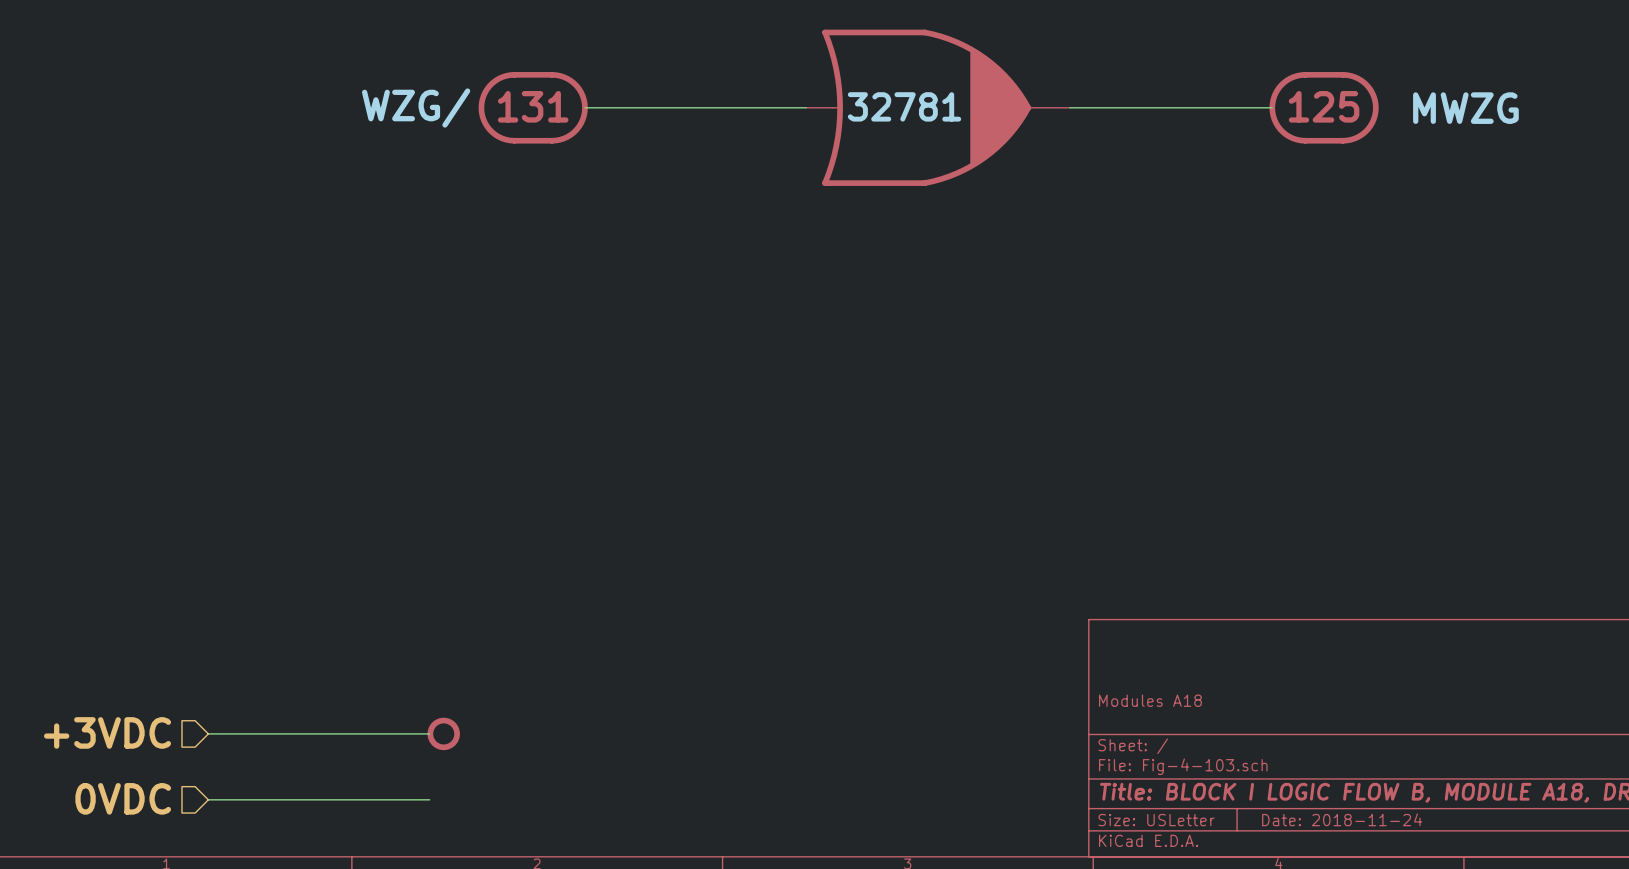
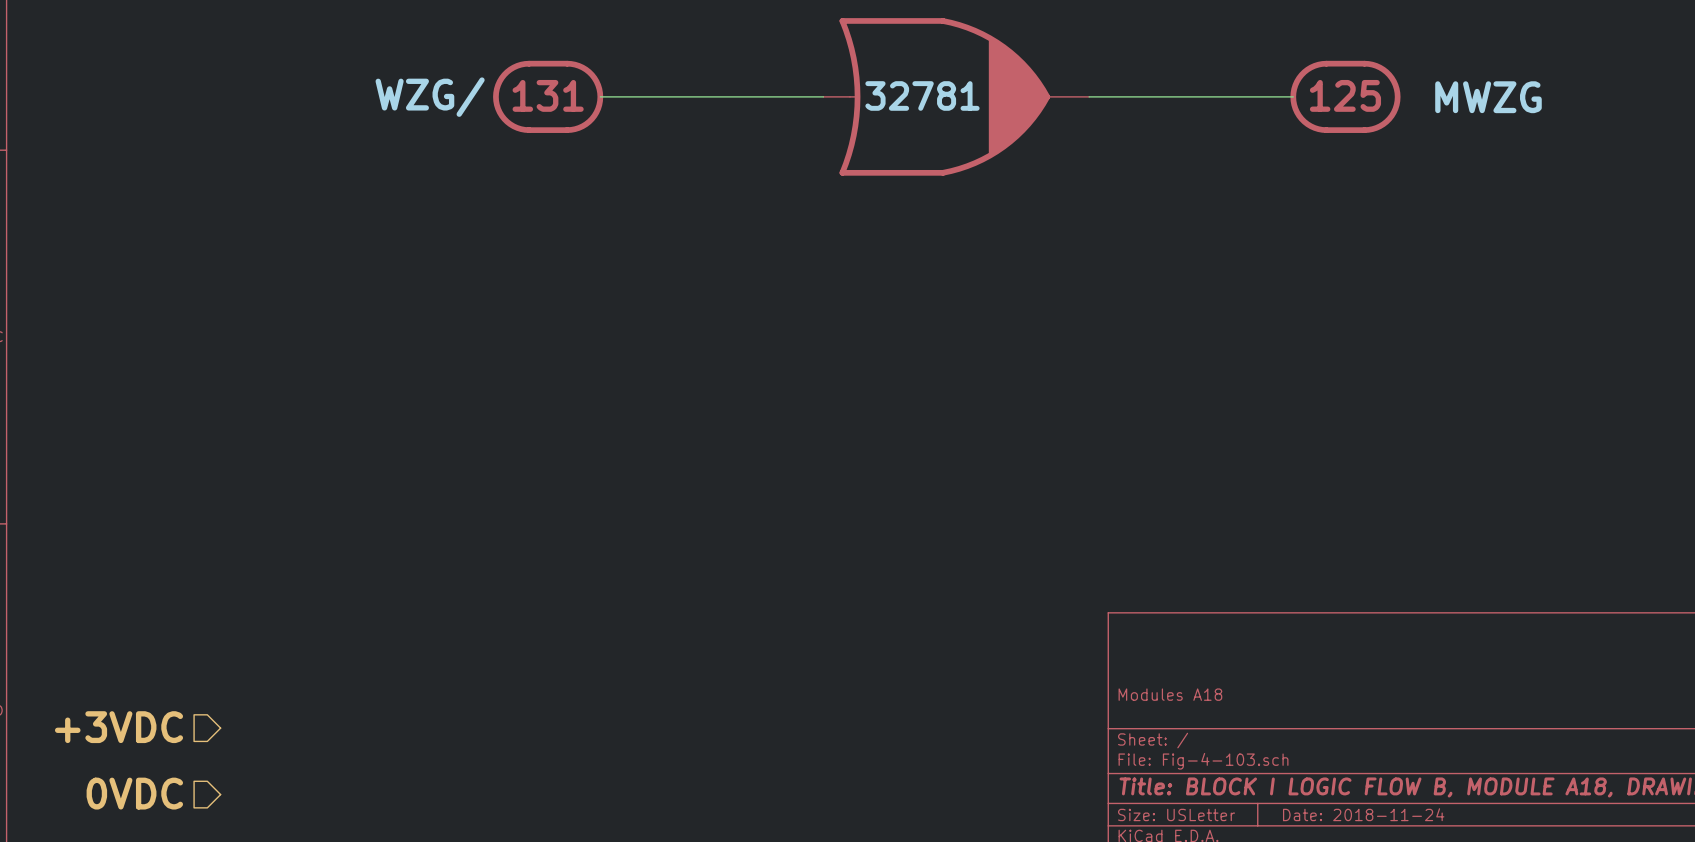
wire: (208, 733) (429, 733) -> none
part: (443, 733) -> none
wire: (208, 799) (429, 799) -> none

